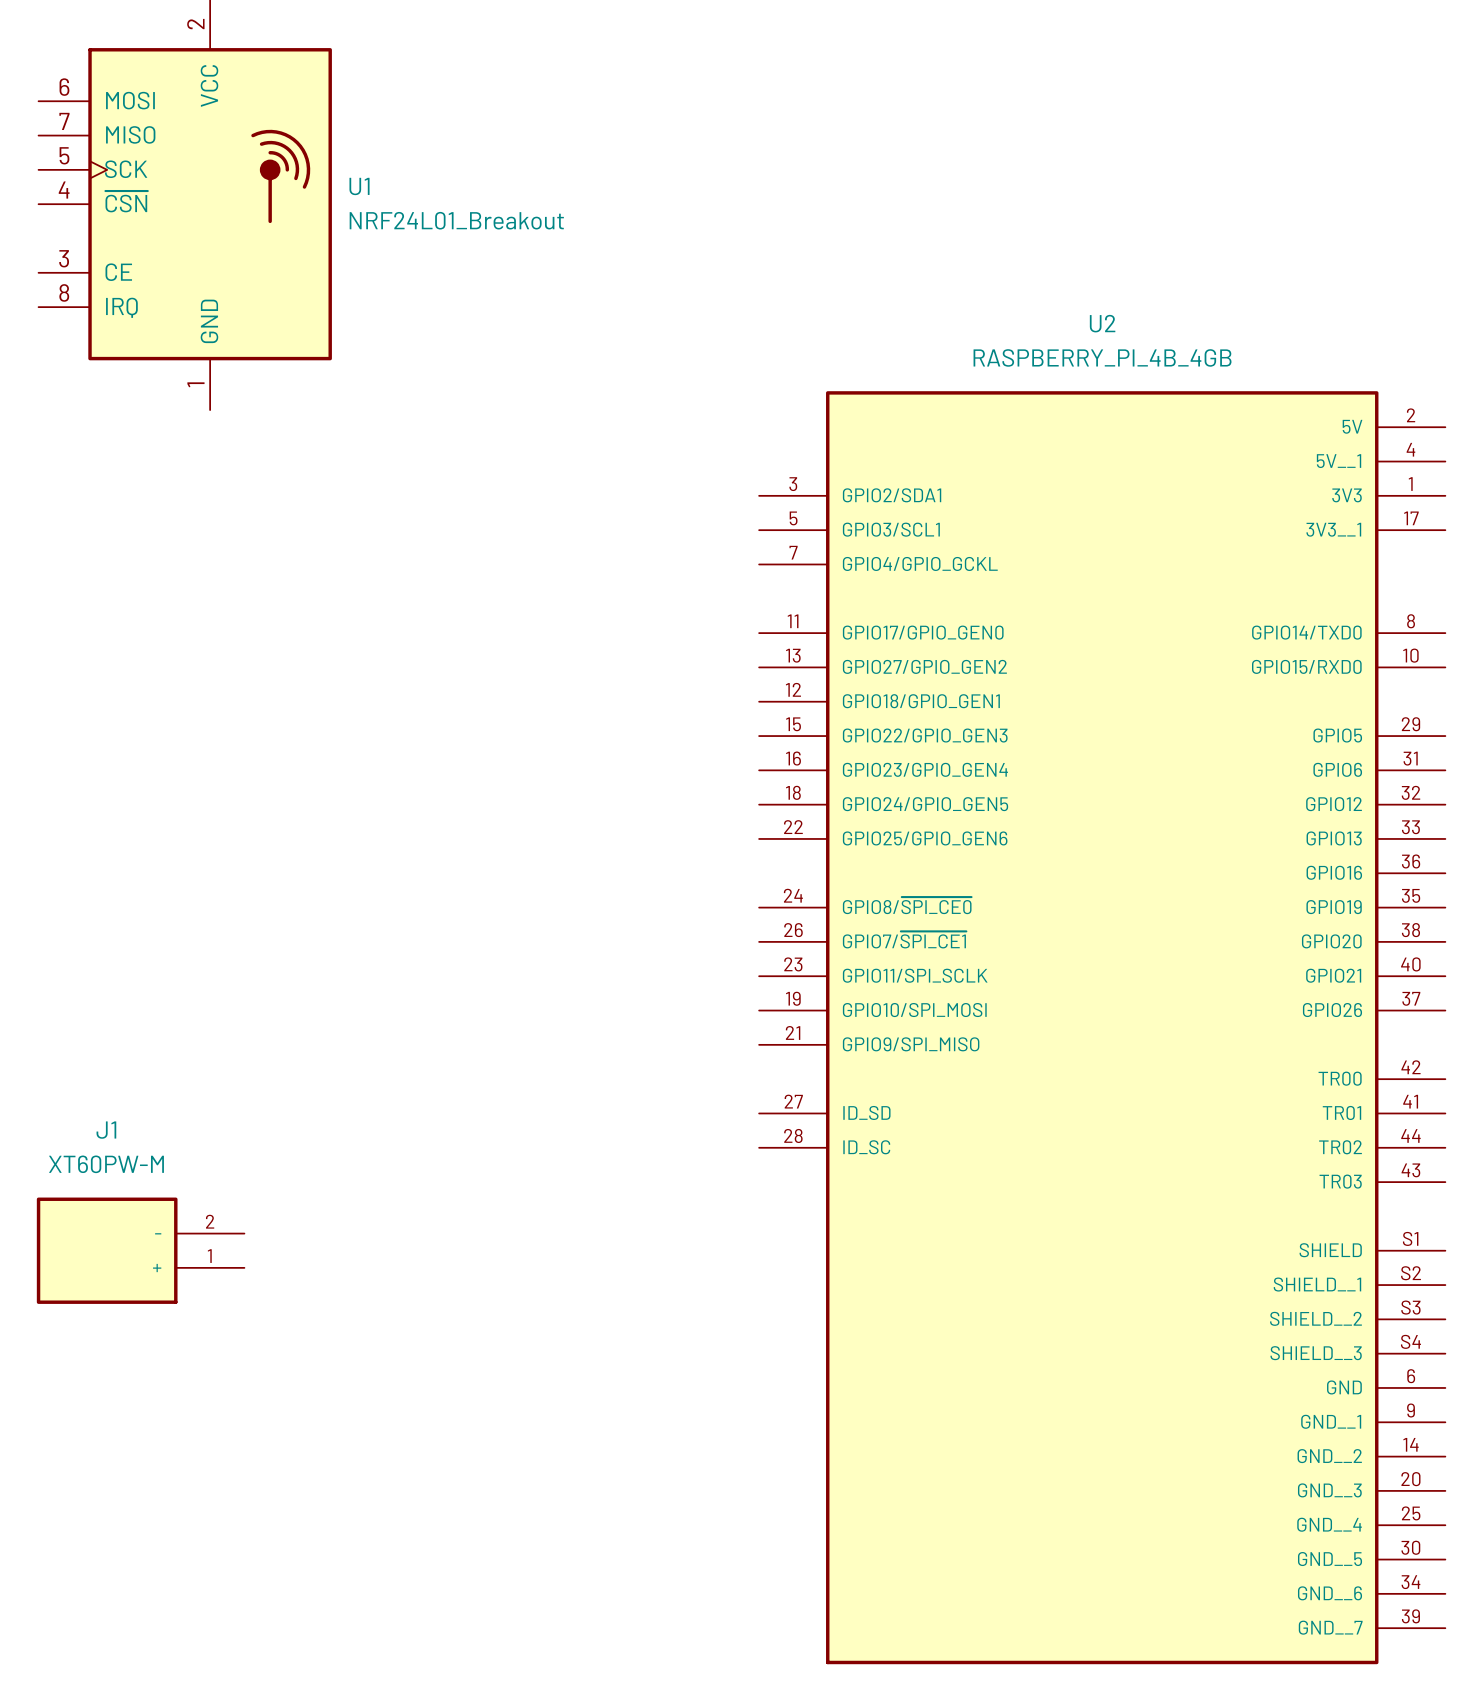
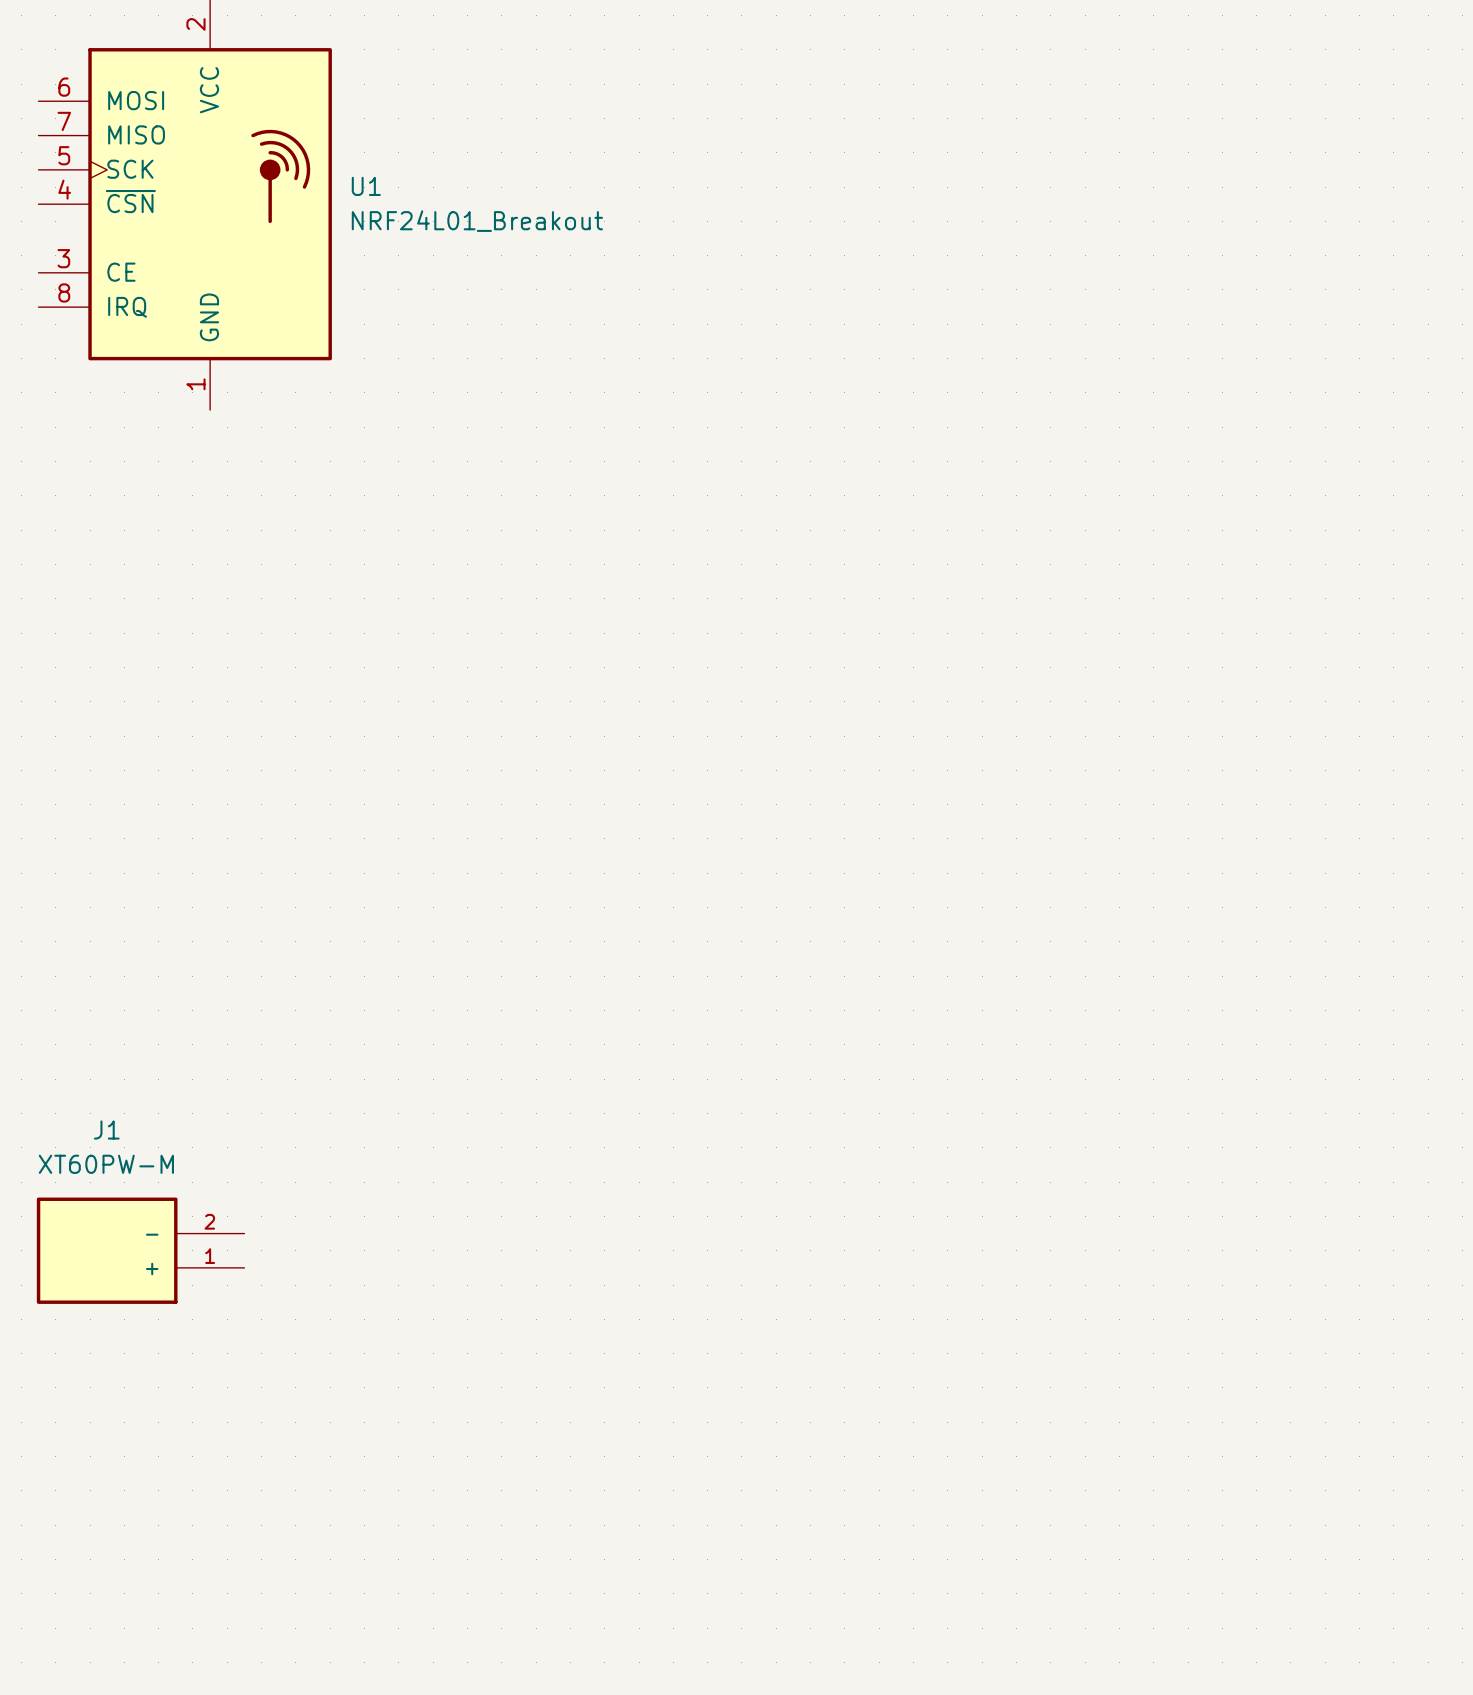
U2: RASPBERRY_PI_4B_4GB (1102, 1027) -> none

